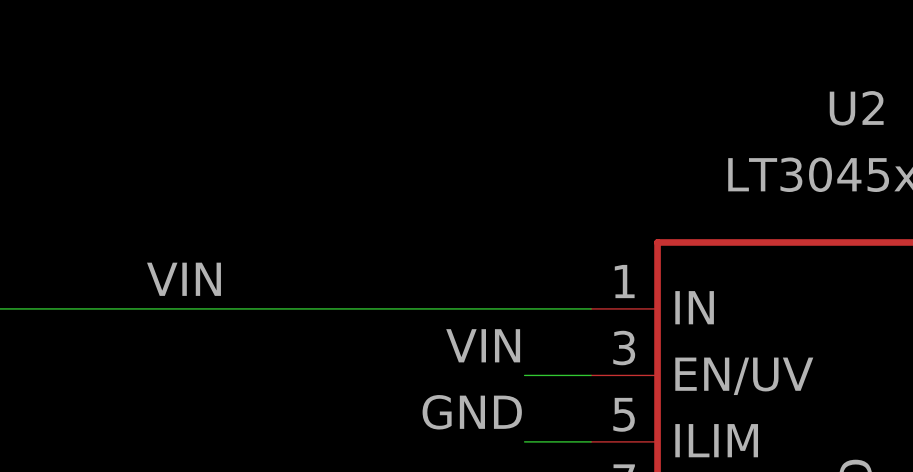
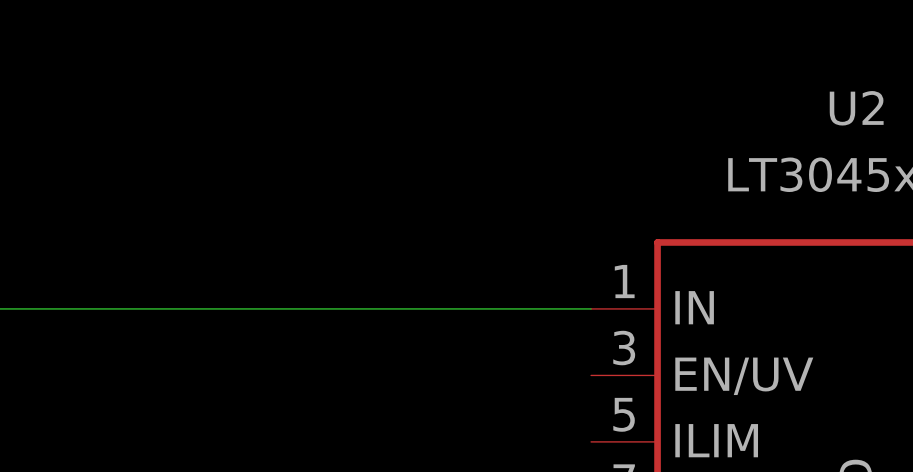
label: VIN (183, 279) -> none
label: VIN (483, 345) -> none
wire: (524, 375) (591, 375) -> none
label: GND (472, 412) -> none
wire: (524, 441) (591, 441) -> none

